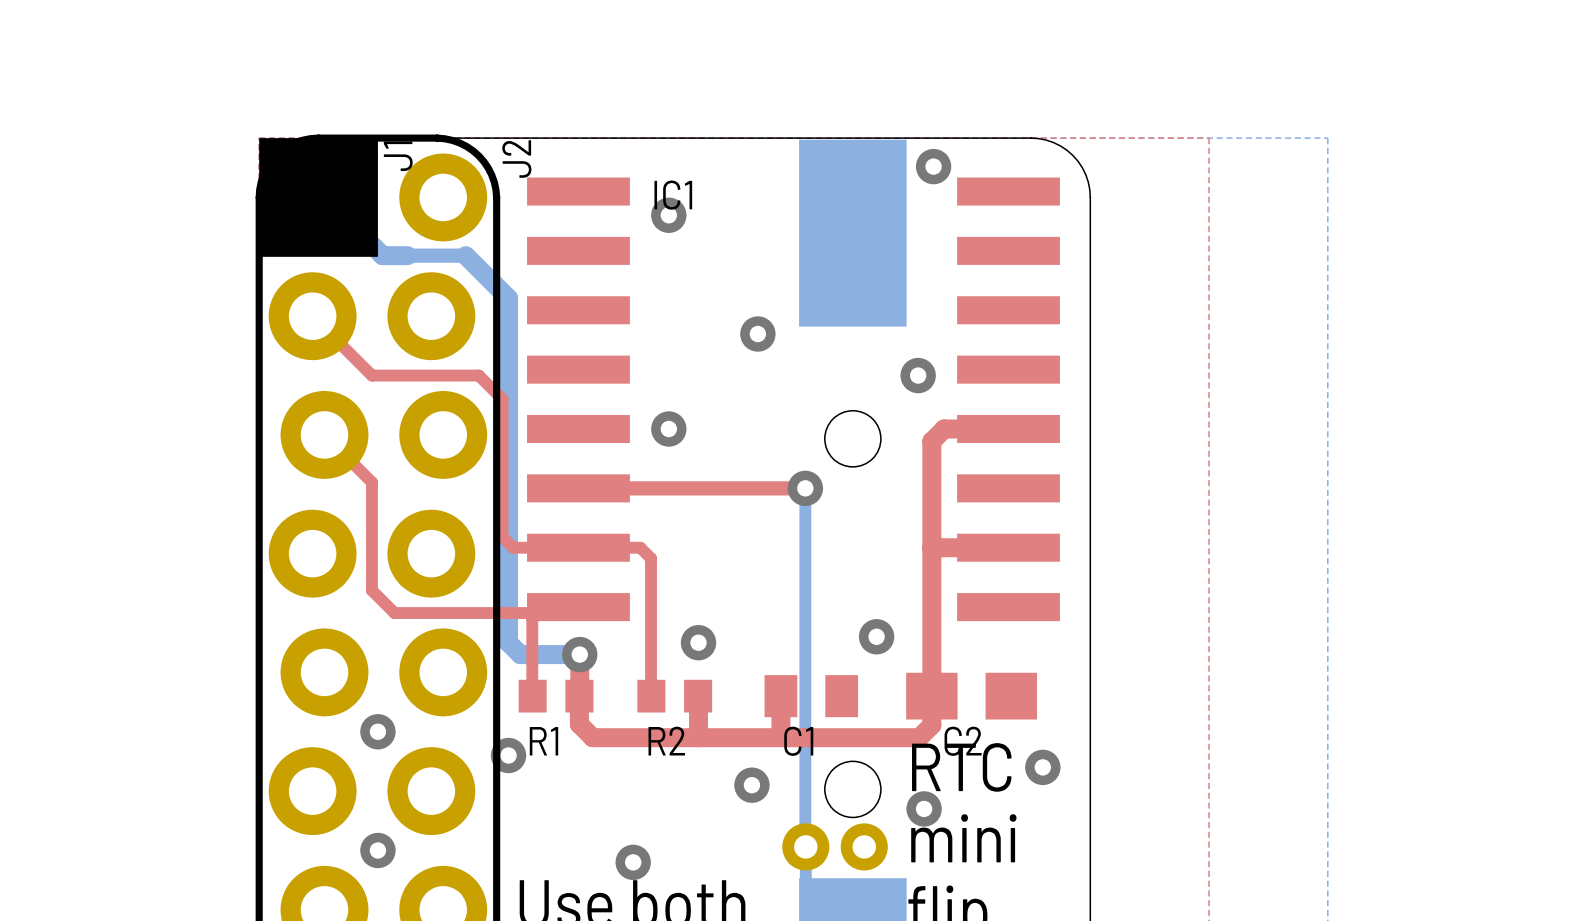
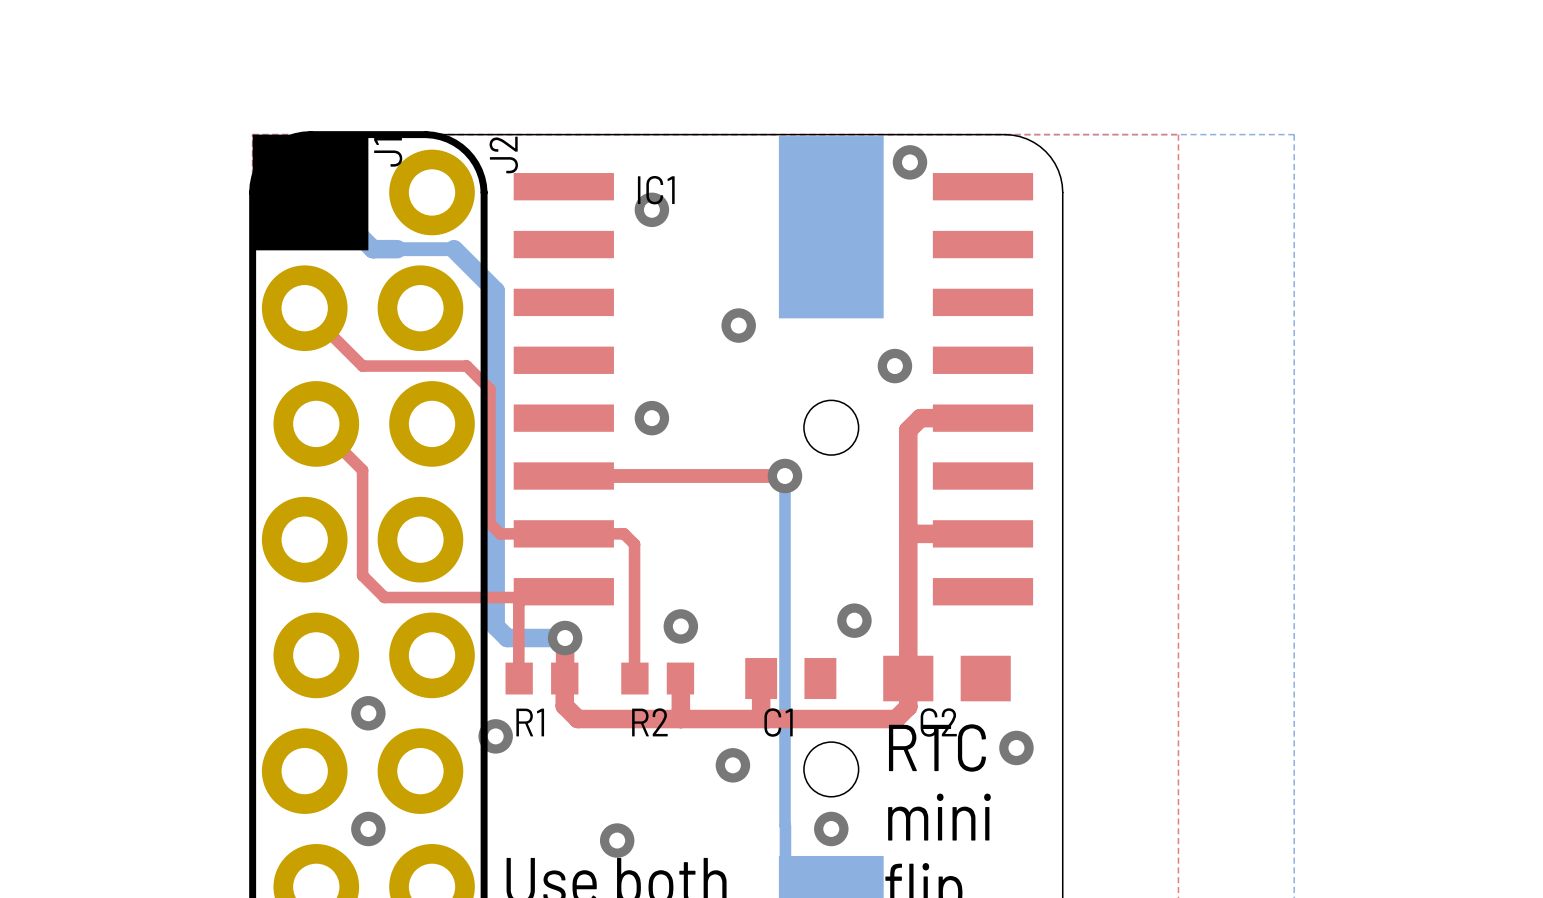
via position: (924, 808) -> (831, 828)
part: (835, 846) -> none

